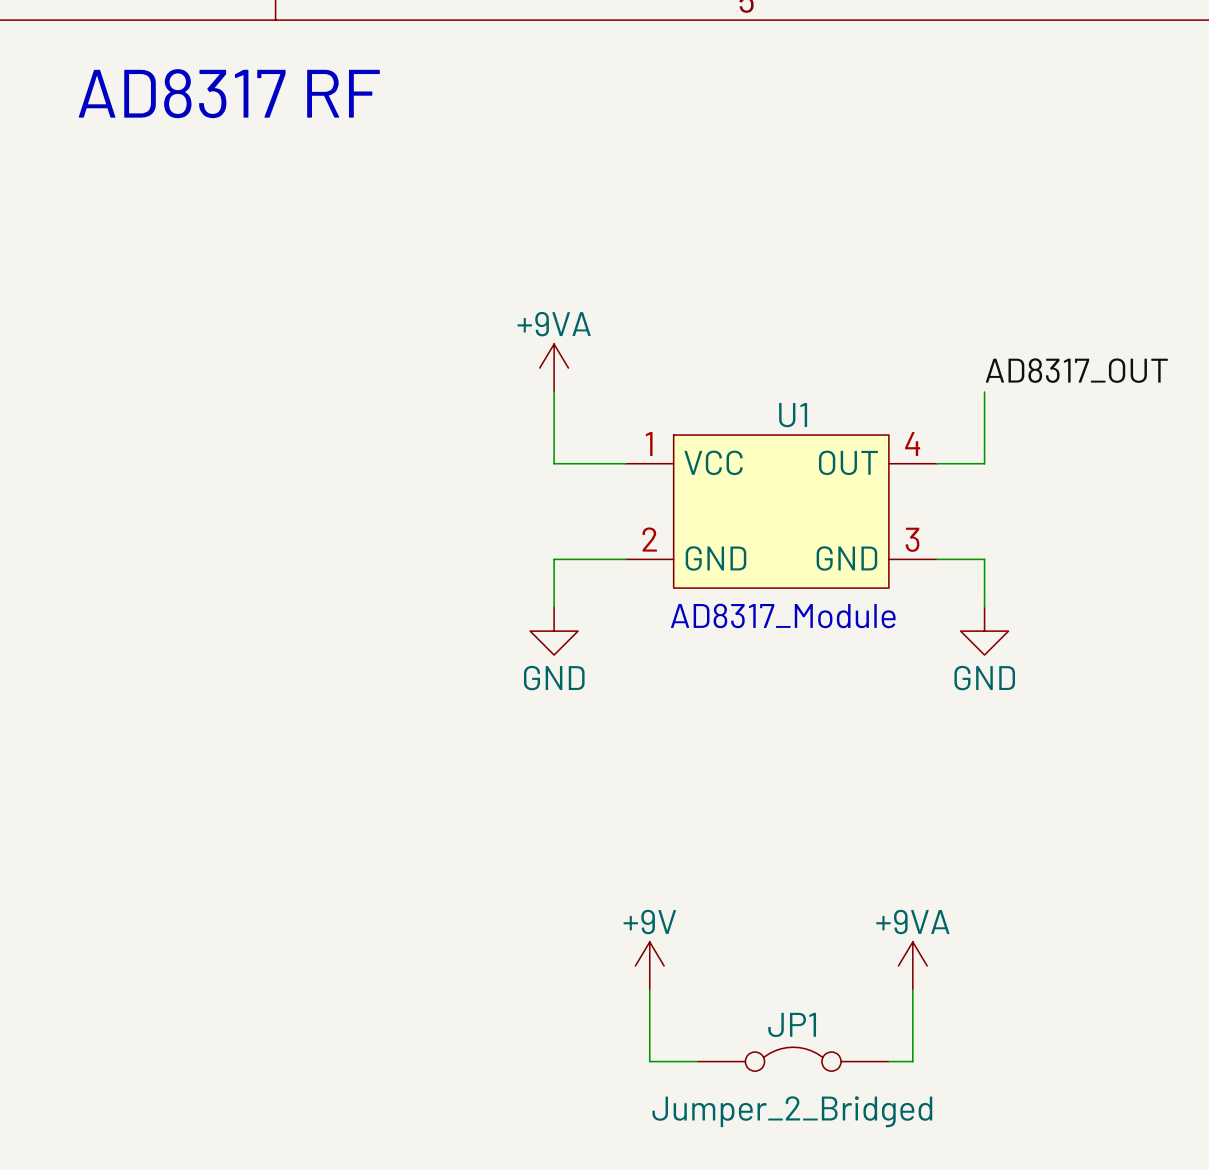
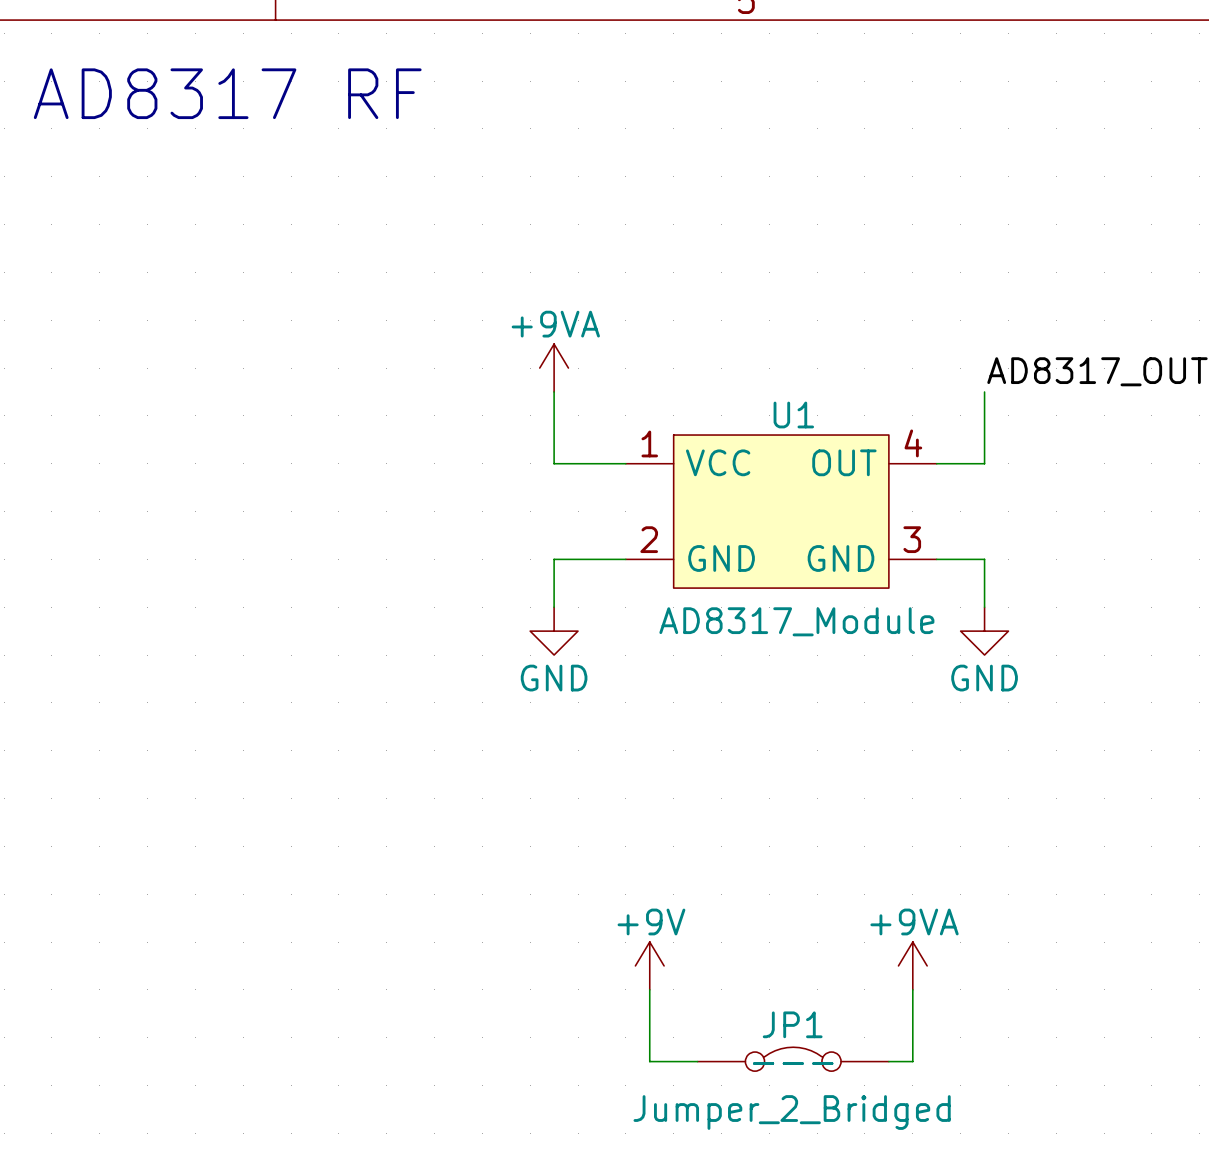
text: AD8317_Module (783, 615) -> none
U1 value: none -> AD8317_Module (796, 621)
JP1 text: none -> --- (793, 1063)
JP1 text: none -> --- (793, 1063)

